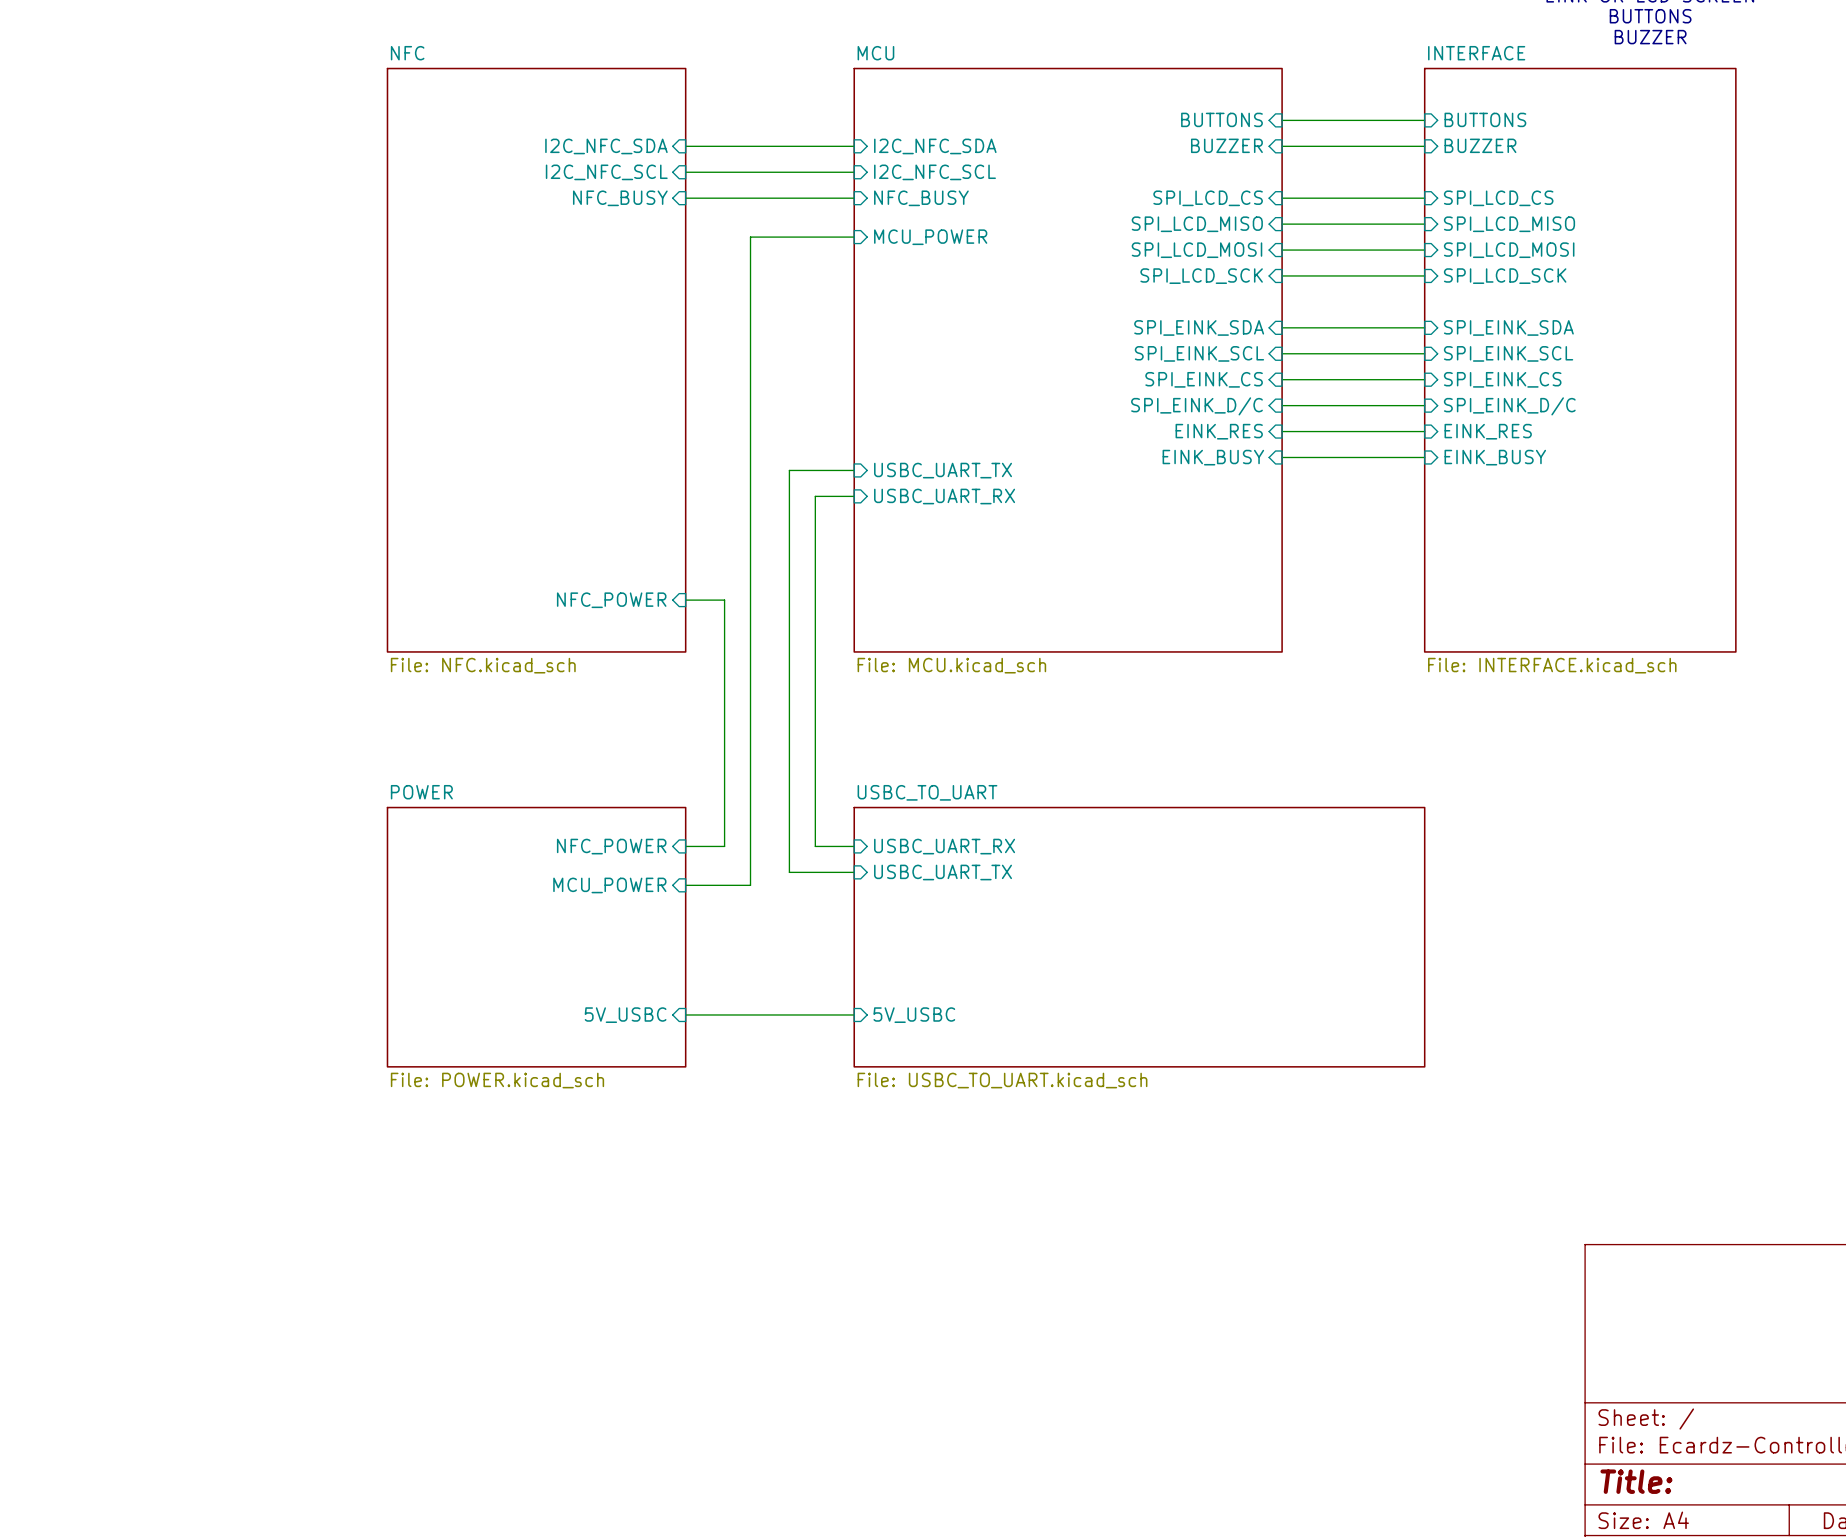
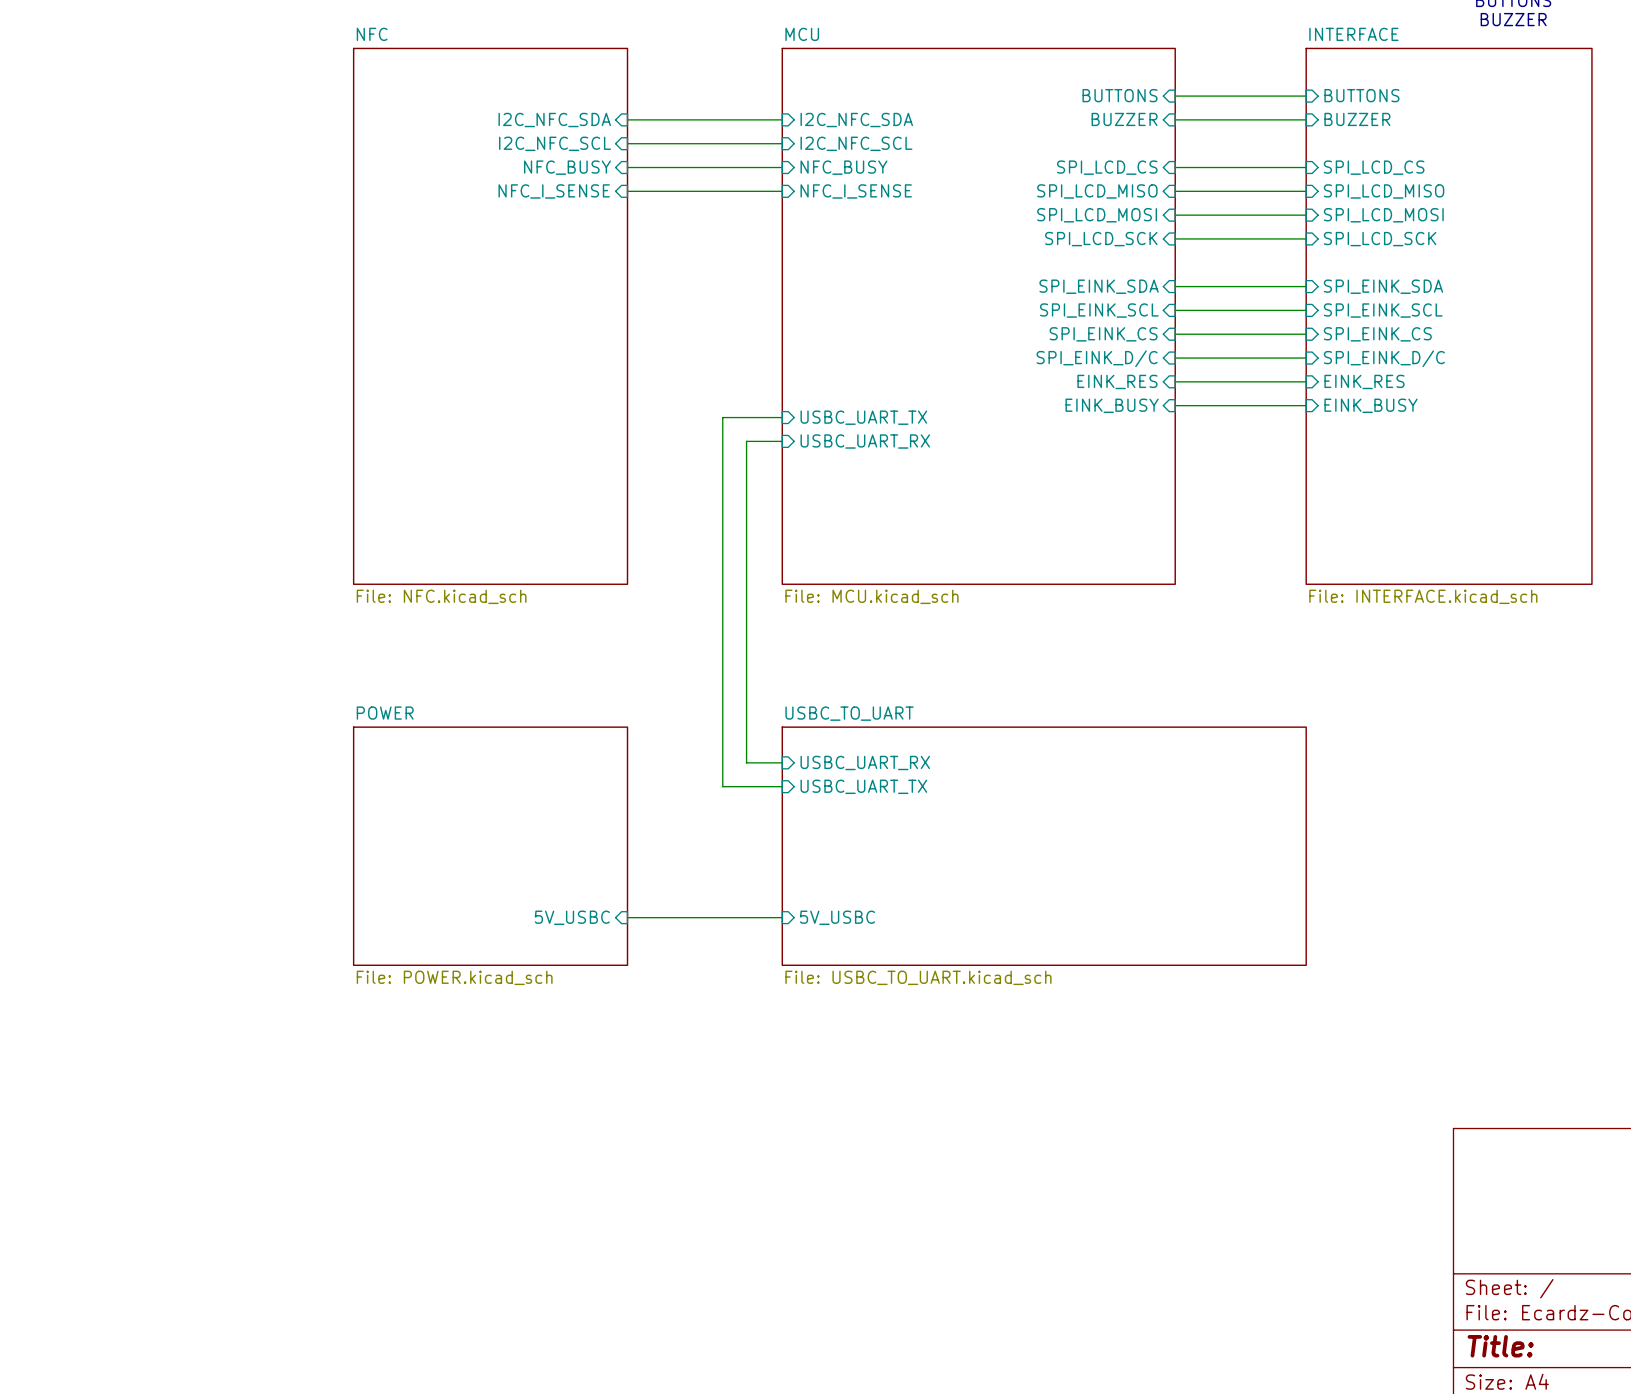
sheet pin: none -> NFC_I_SENSE (554, 191)
wire: none -> (627, 191) (782, 191)
sheet pin: none -> NFC_I_SENSE (856, 191)
wire: (854, 237) (750, 237) (750, 885) (685, 885) -> none
sheet pin: MCU_POWER (930, 237) -> none
sheet pin: NFC_POWER (611, 600) -> none
wire: (685, 600) (724, 600) (724, 846) (685, 846) -> none
sheet pin: NFC_POWER (611, 846) -> none
sheet pin: MCU_POWER (609, 885) -> none

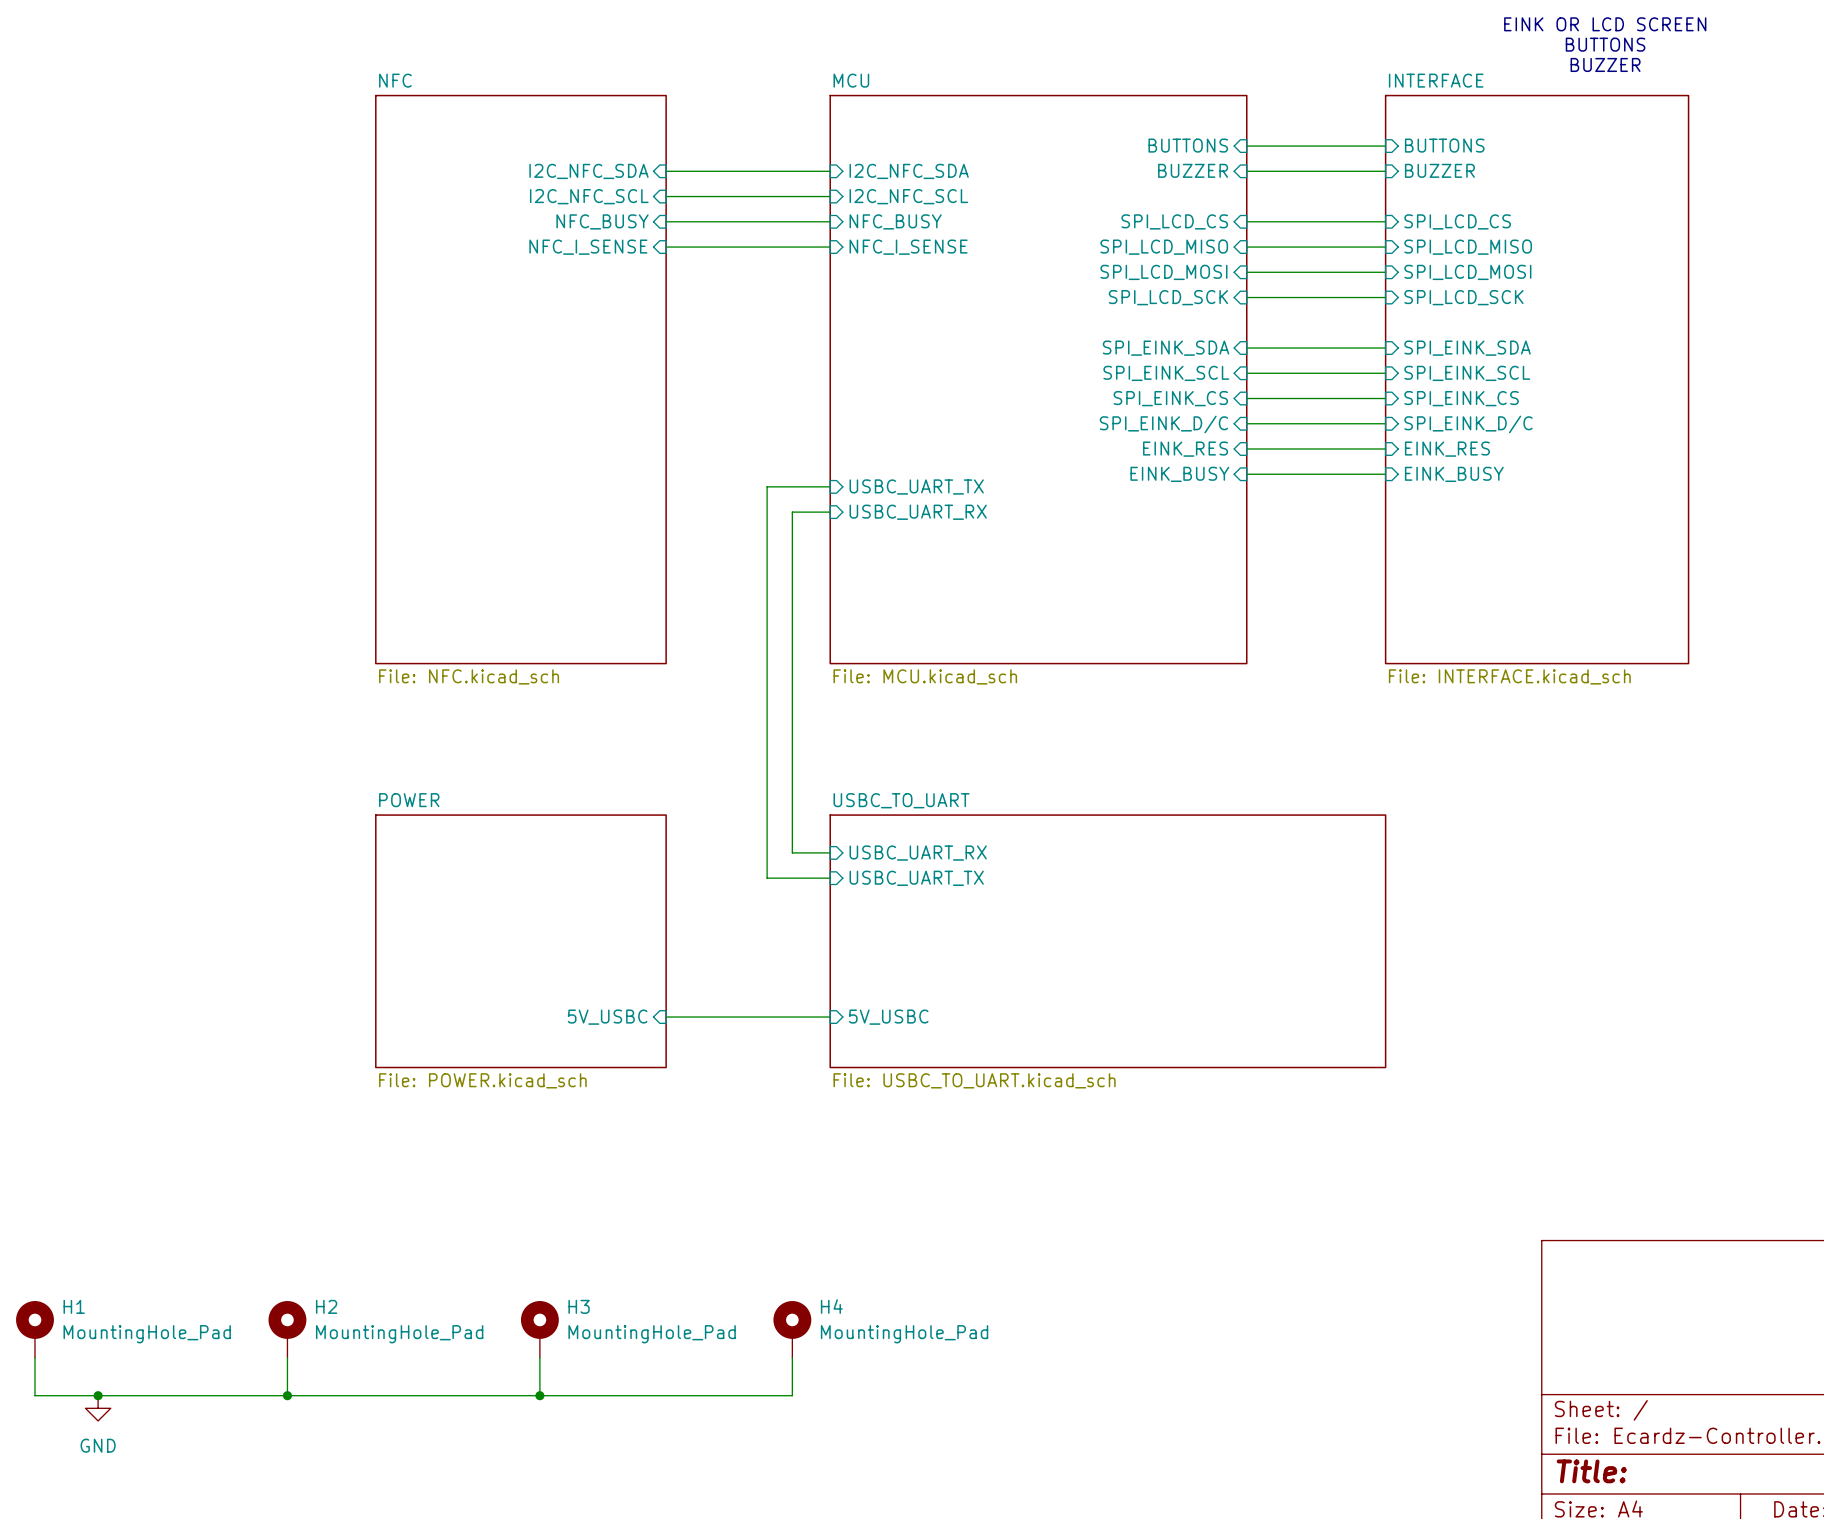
H1: none -> MountingHole_Pad (34, 1329)
H2: none -> MountingHole_Pad (287, 1329)
H3: none -> MountingHole_Pad (539, 1329)
H4: none -> MountingHole_Pad (792, 1329)
wire: none -> (34, 1357) (34, 1395) (792, 1395) (792, 1357)
wire: none -> (287, 1357) (287, 1395)
wire: none -> (539, 1357) (539, 1395)
junction: none -> (98, 1395)
junction: none -> (287, 1395)
junction: none -> (539, 1395)
power symbol: none -> GND (98, 1408)

